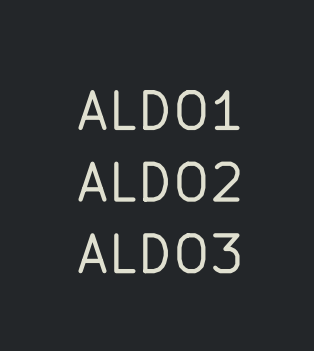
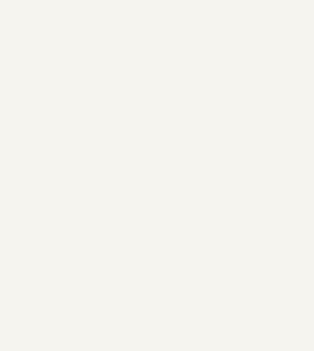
label: ALDO1 (158, 110) -> none
label: ALDO2 (158, 181) -> none
label: ALDO3 (158, 253) -> none

